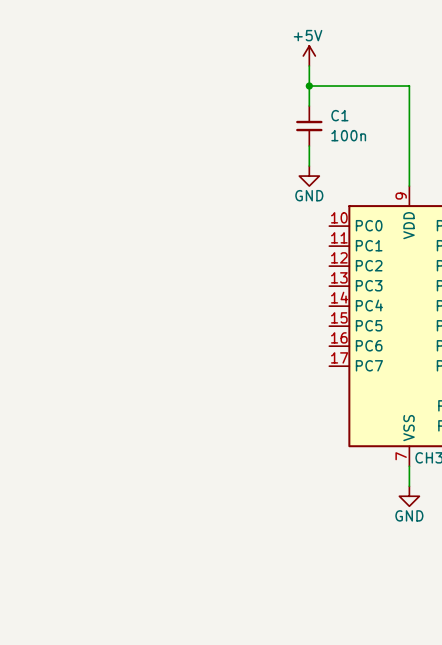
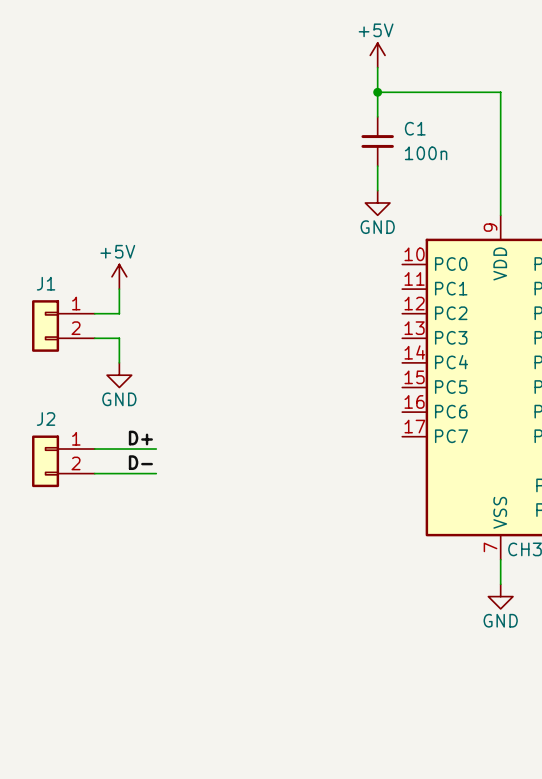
power symbol: none -> +5V (119, 276)
wire: none -> (119, 289) (119, 313) (94, 313)
J1: none -> (63, 326)
wire: none -> (94, 338) (119, 338) (119, 362)
power symbol: none -> GND (119, 375)
label: none -> D+ (140, 438)
wire: none -> (94, 449) (156, 449)
J2: none -> (63, 461)
label: none -> D- (140, 462)
wire: none -> (94, 473) (156, 473)

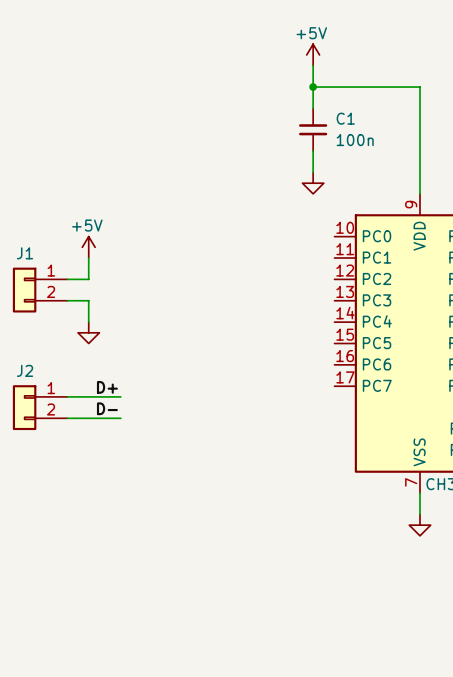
power symbol text: GND (377, 227) -> none
power symbol text: GND (119, 399) -> none
power symbol text: GND (500, 620) -> none

